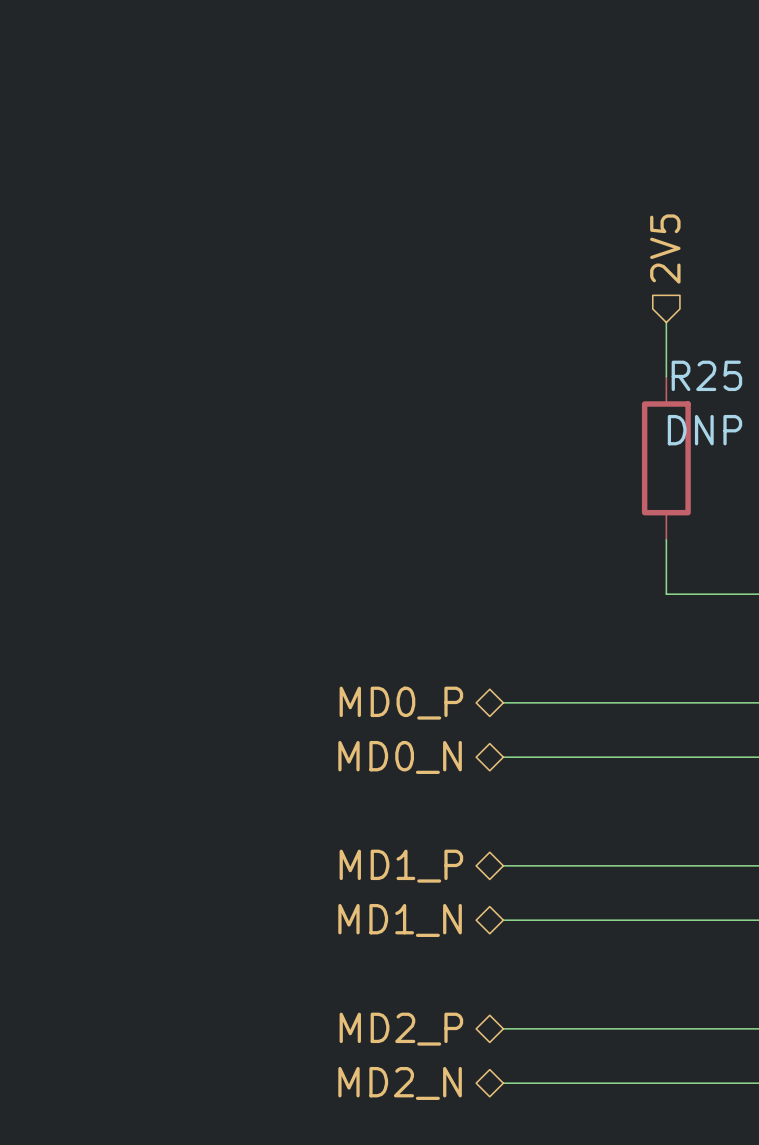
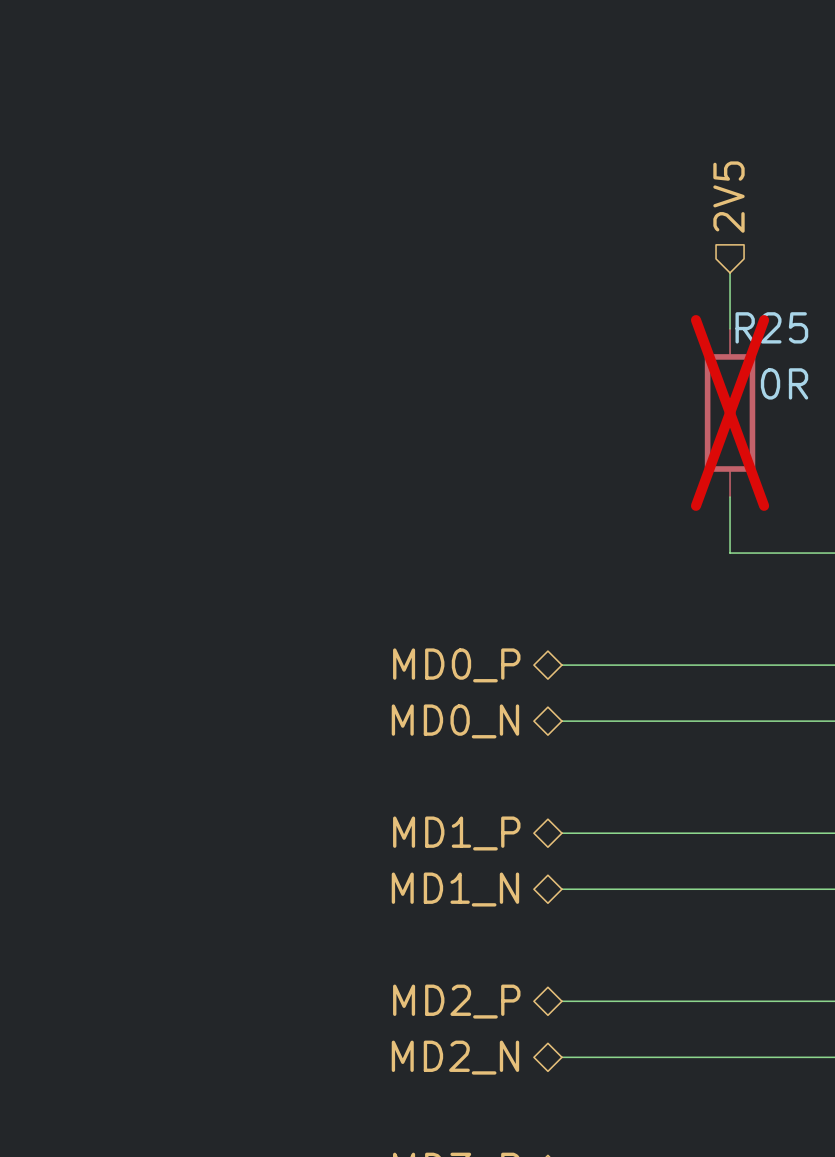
R25 value: DNP (704, 430) -> 0R (784, 383)
R25 do-not-place cross: none -> (730, 412)

